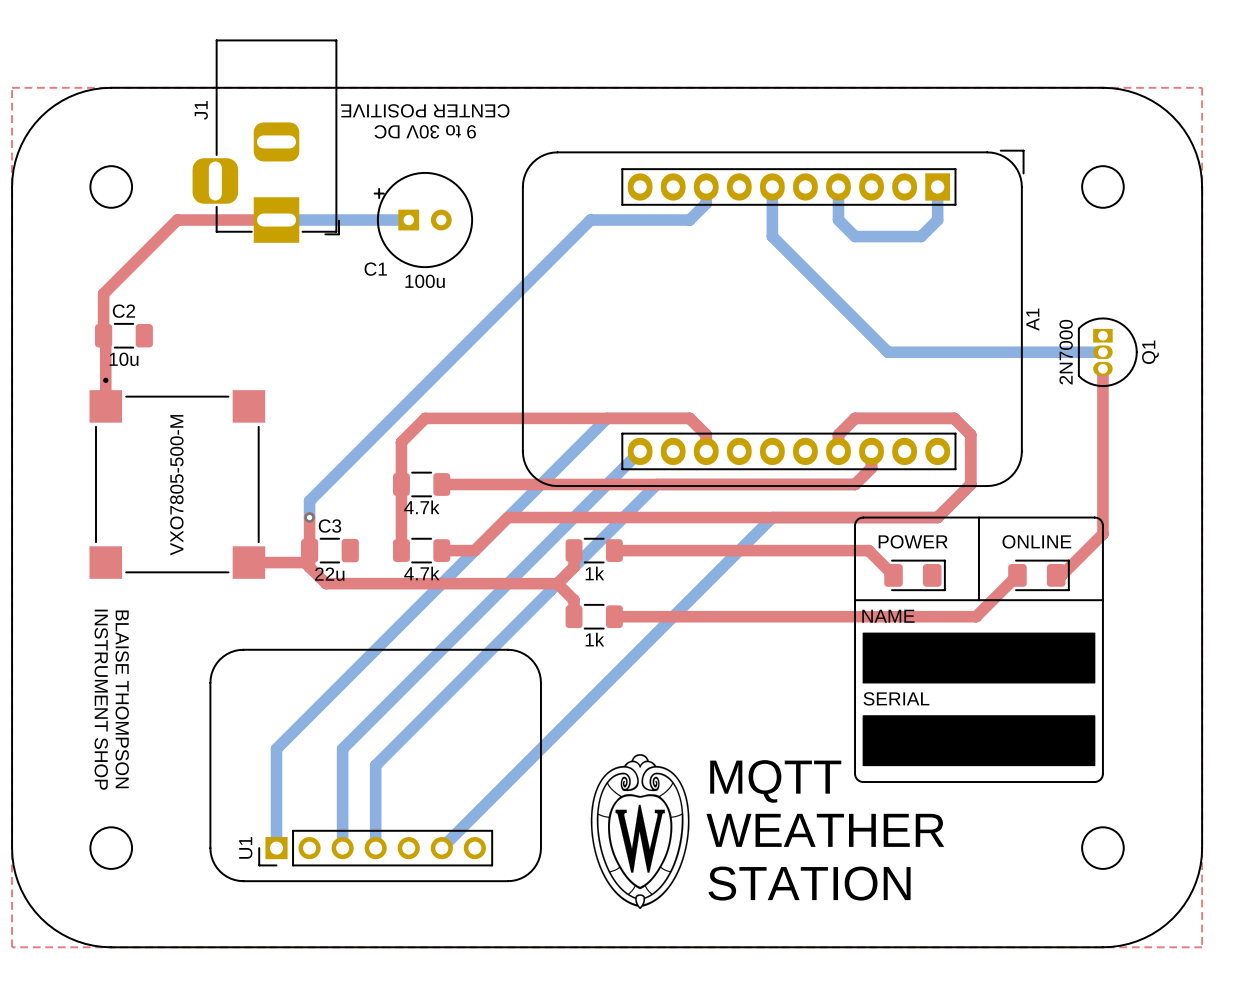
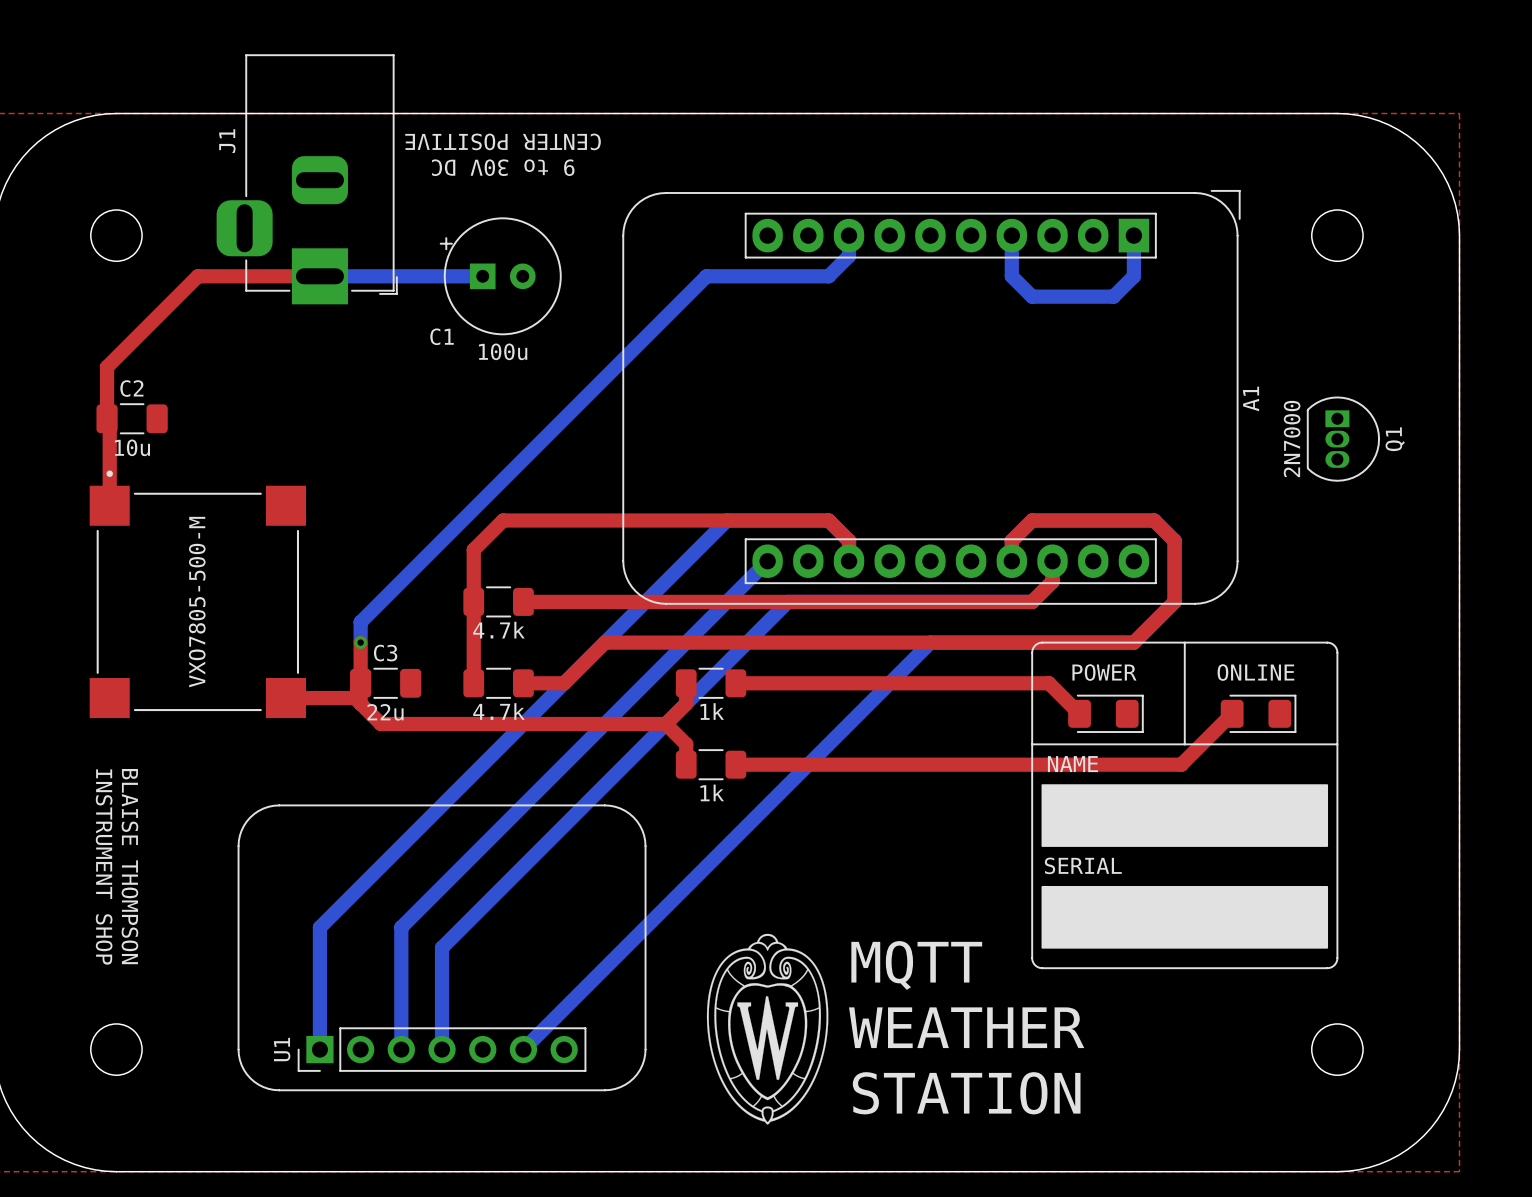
bottom track: (772, 186) (772, 236) (888, 352) (1102, 352) -> none
top track: (1102, 368) (1102, 534) (1061, 575) (1056, 575) -> none

